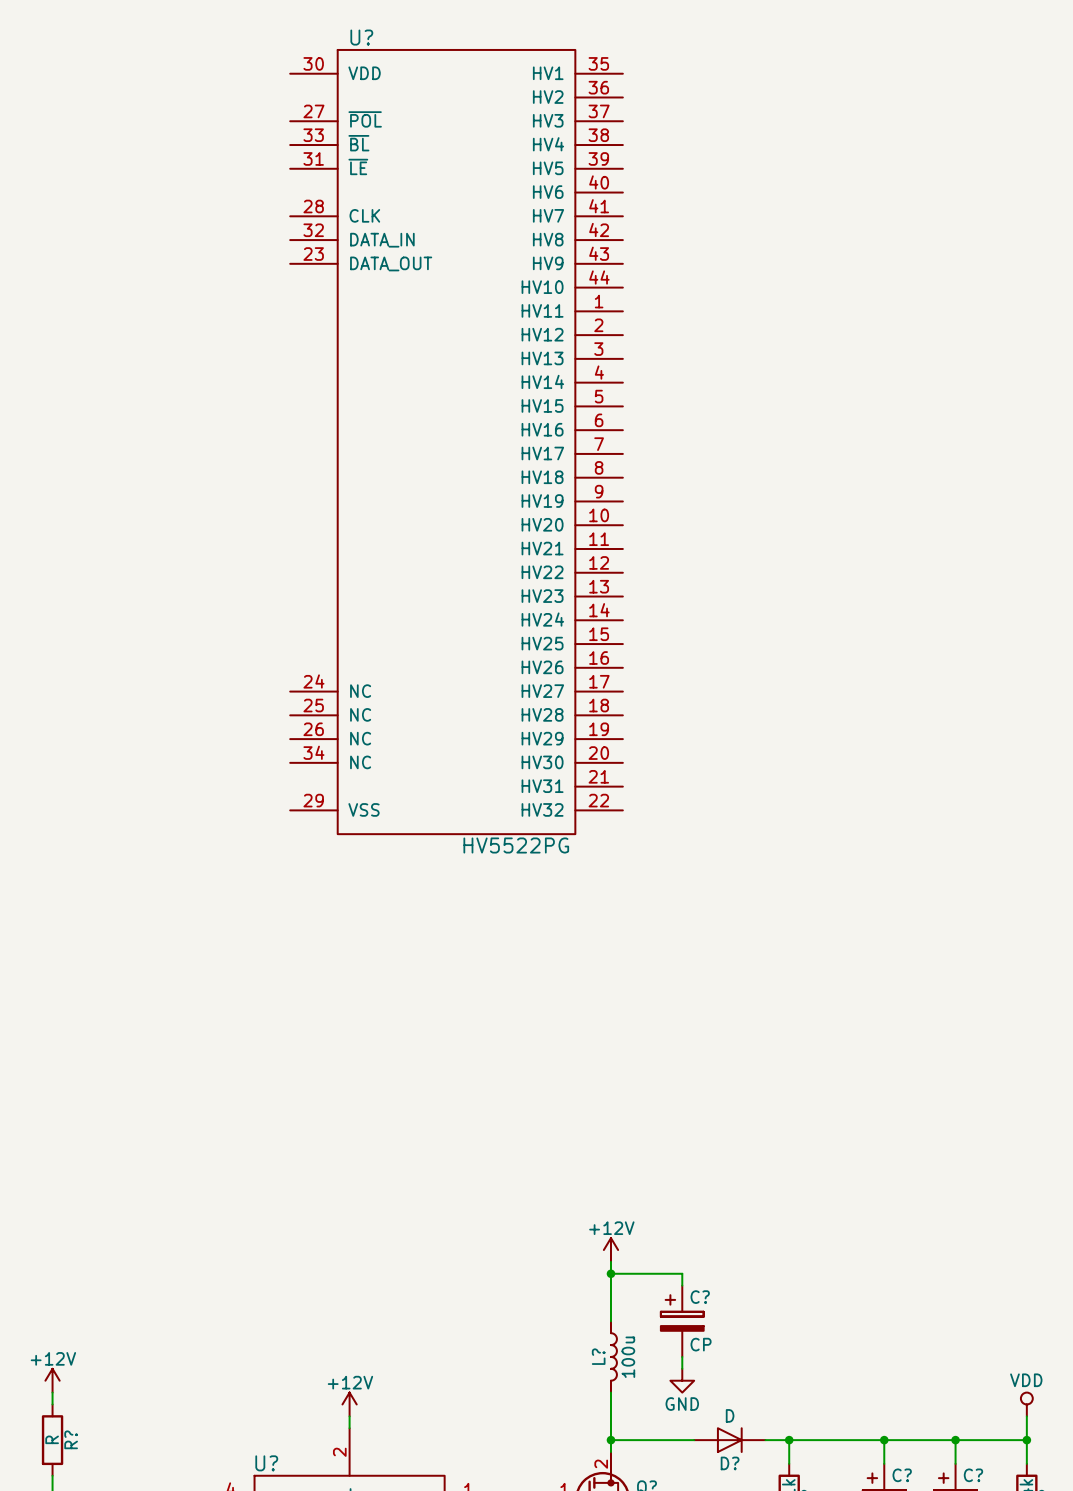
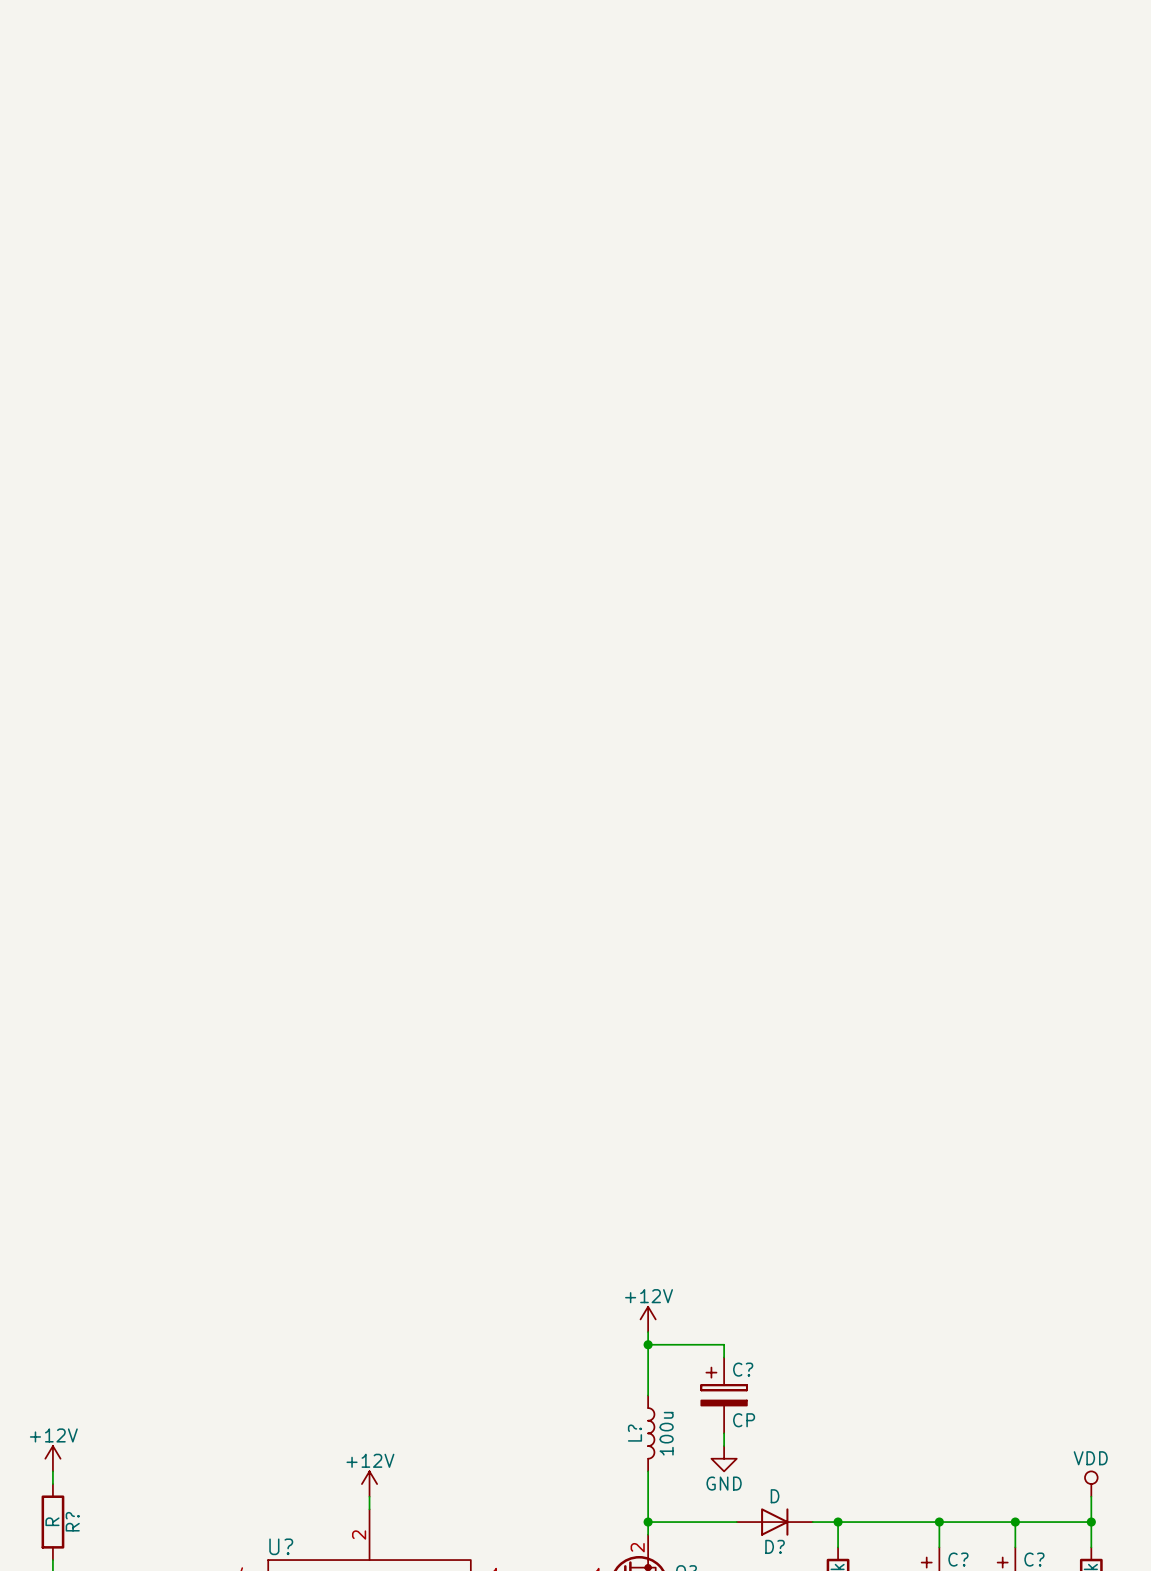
U?: HV5522PG (456, 442) -> none

